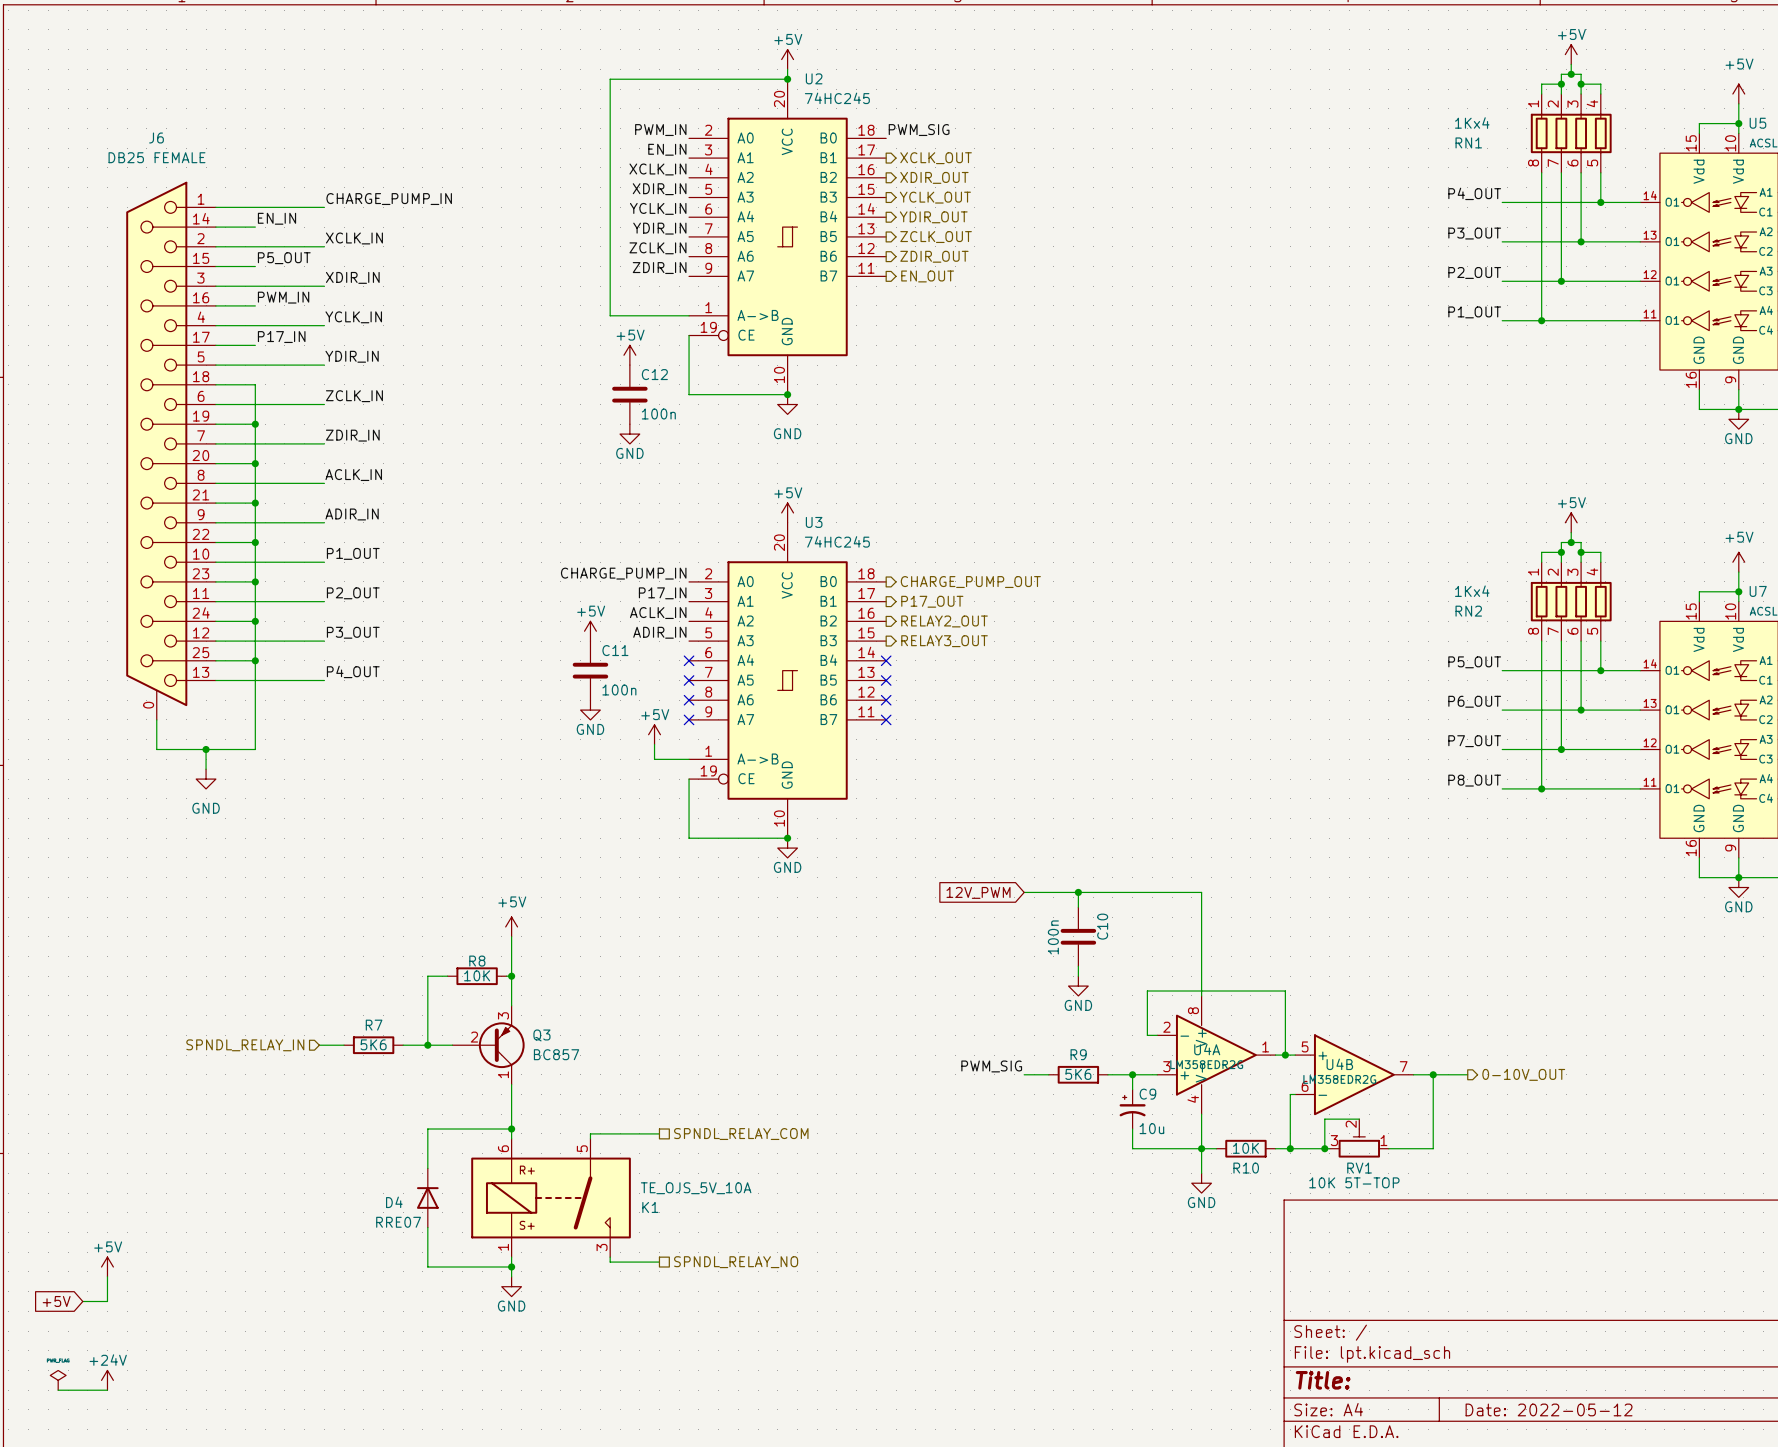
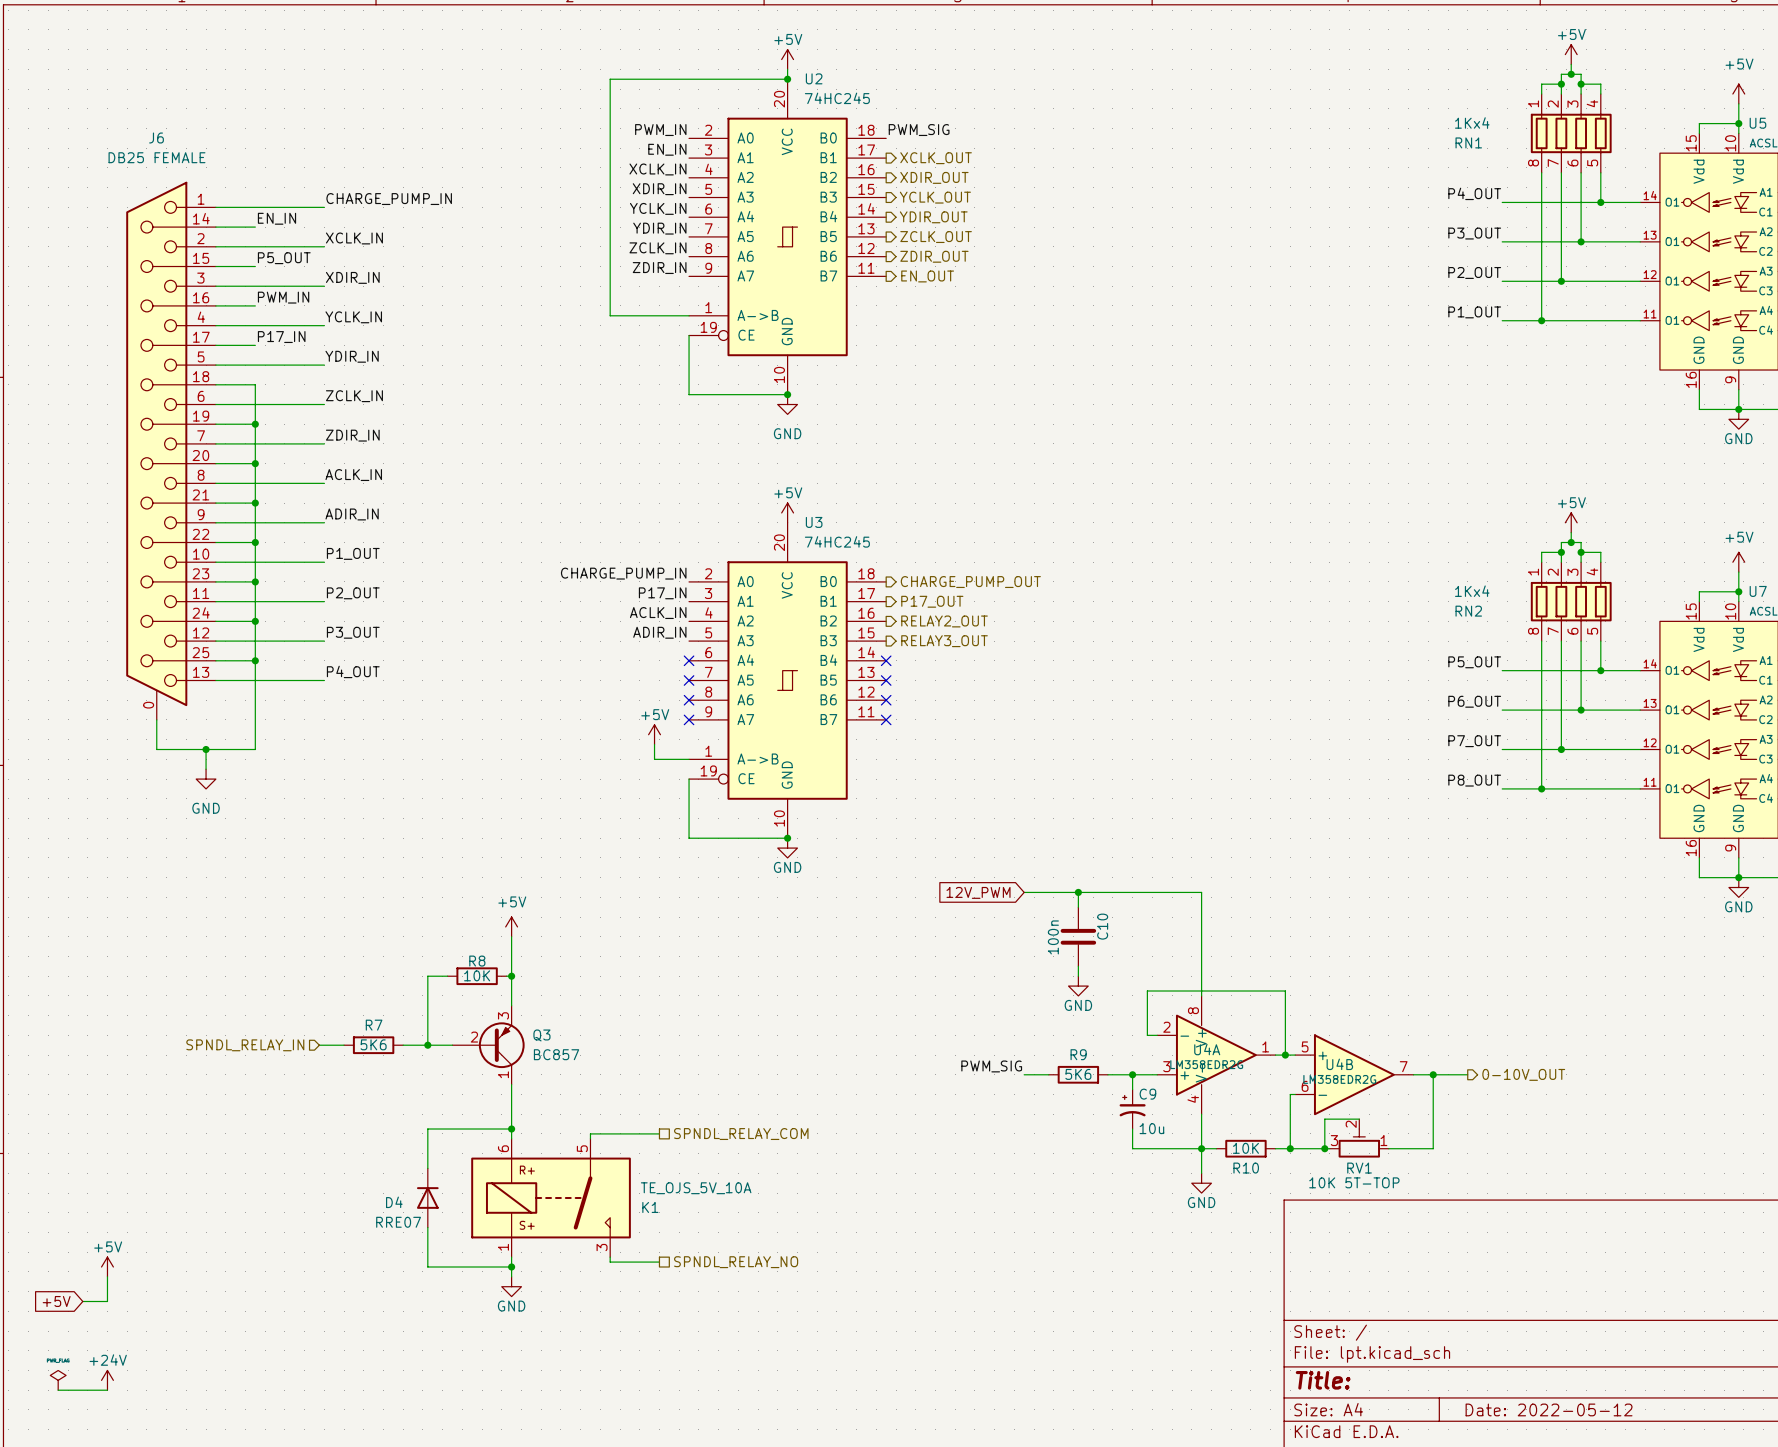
power symbol: +5V (629, 355) -> none
C12: 100n (629, 394) -> none
power symbol: GND (629, 434) -> none
power symbol: +5V (590, 631) -> none
C11: 100n (590, 670) -> none
power symbol: GND (590, 710) -> none

